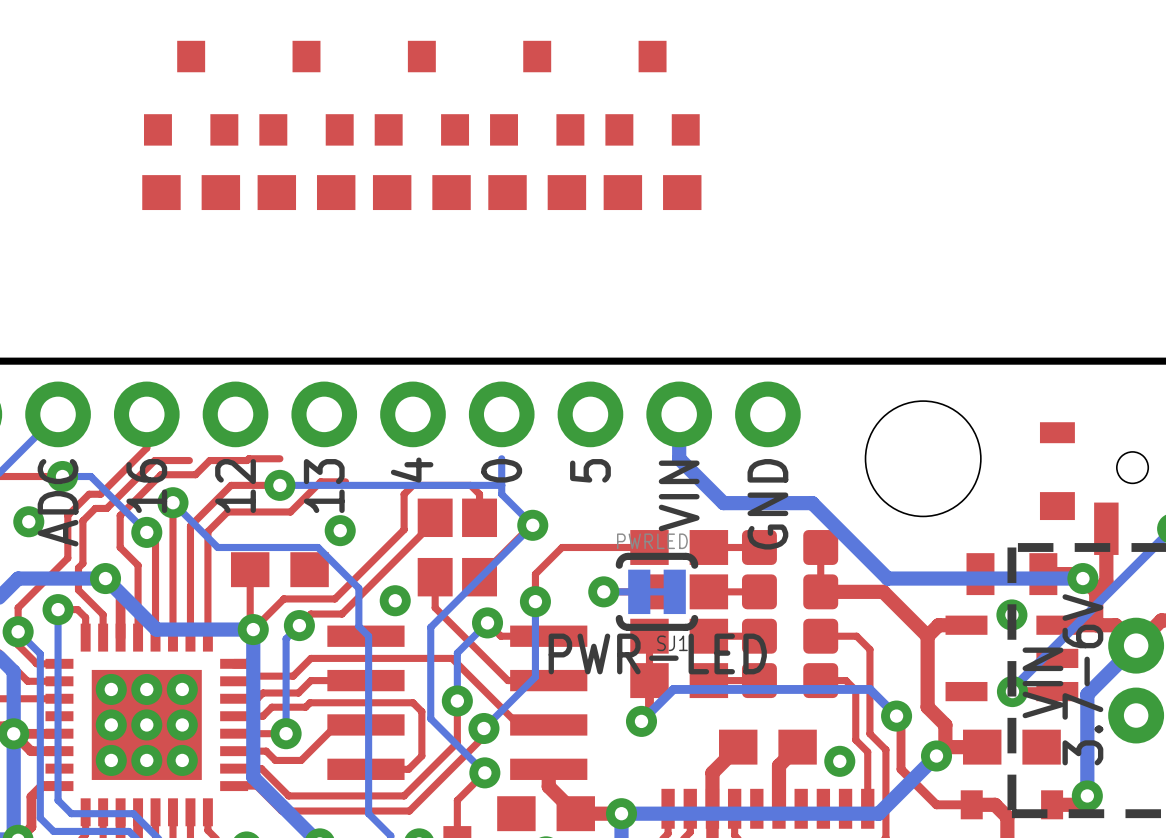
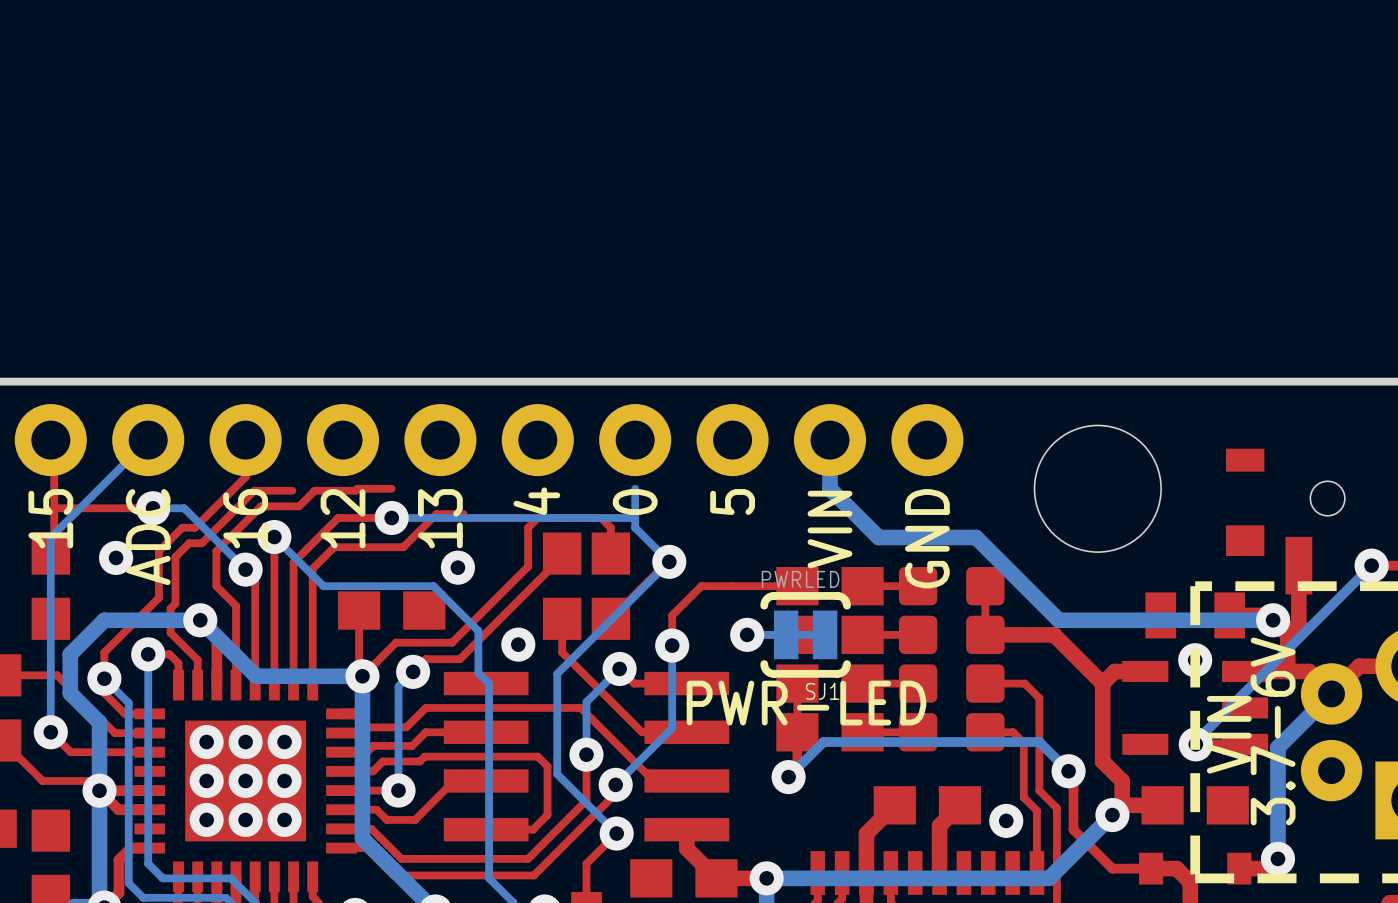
part: (191, 93) -> none
part: (306, 93) -> none
part: (421, 93) -> none
part: (537, 93) -> none
part: (652, 93) -> none
part: (191, 192) -> none
part: (306, 192) -> none
part: (421, 192) -> none
part: (537, 192) -> none
part: (652, 192) -> none

